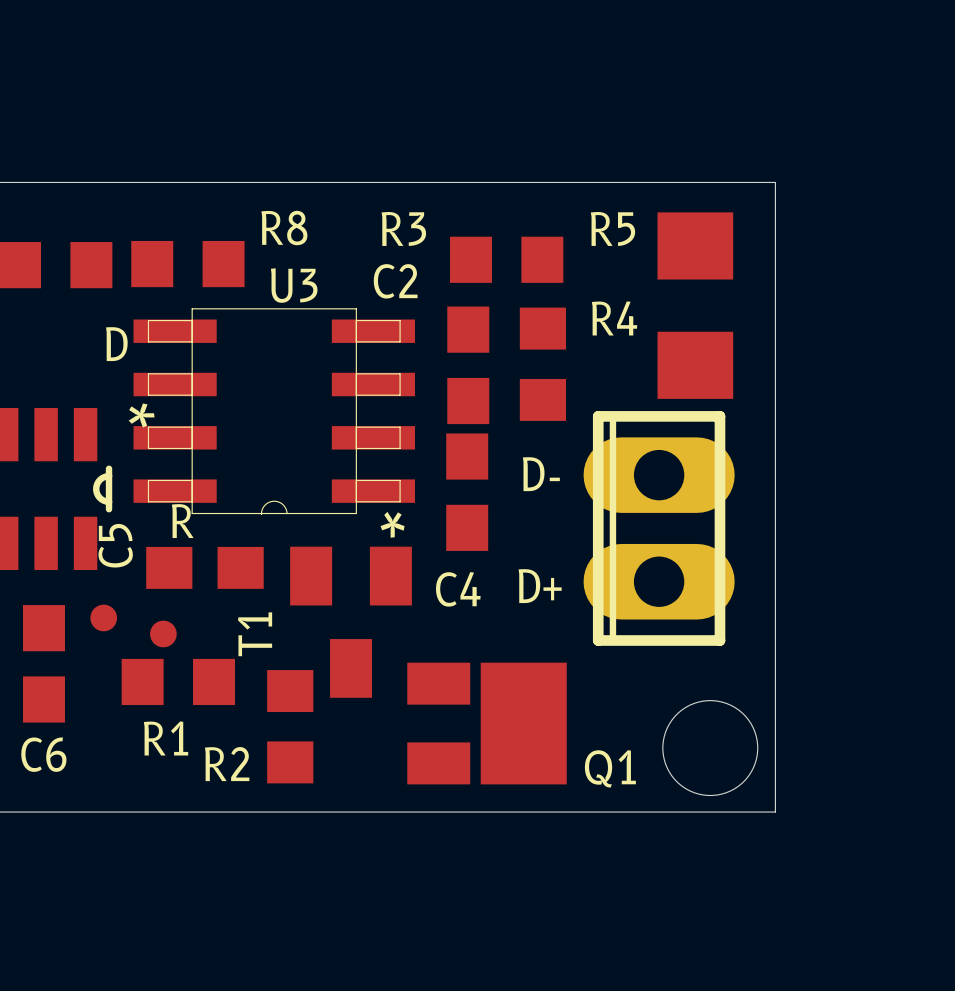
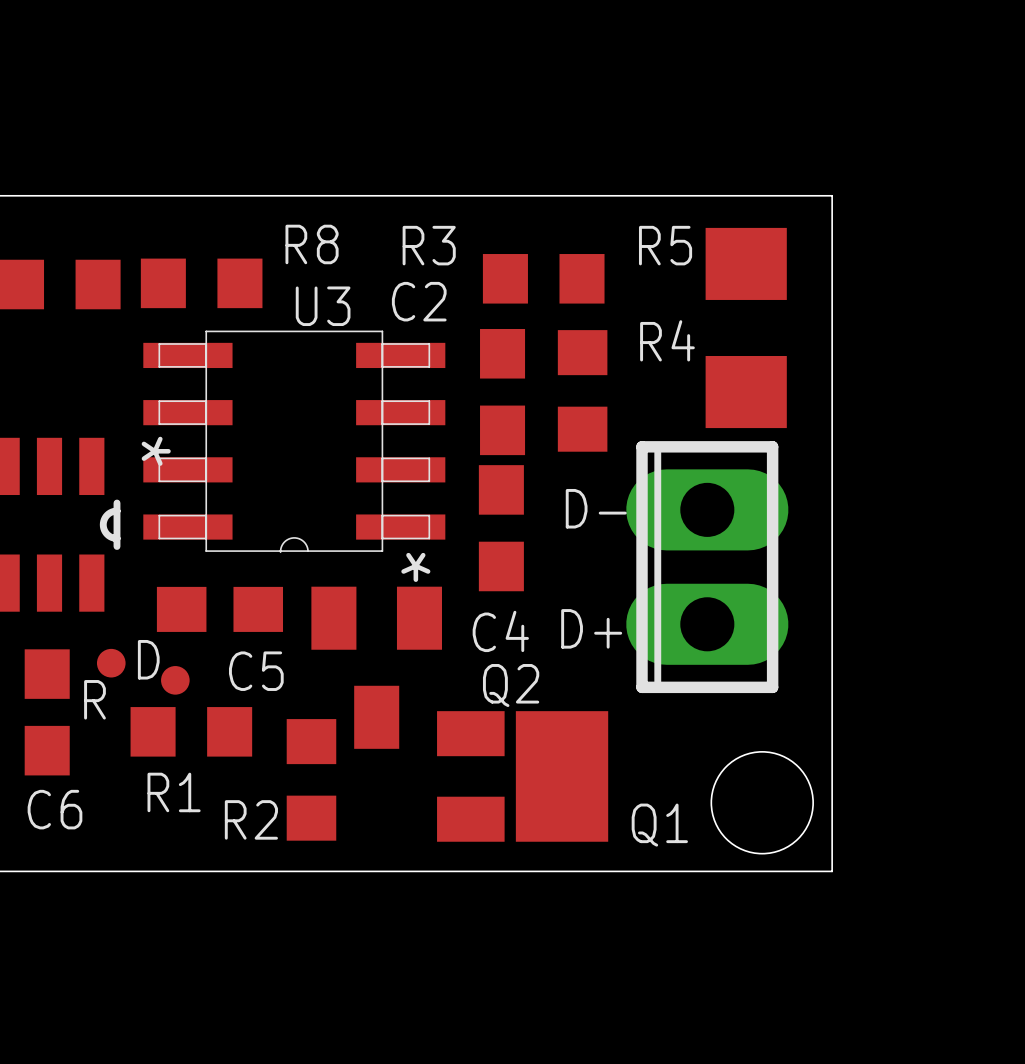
text position: D (116, 344) -> D (148, 659)
text position: R (182, 521) -> R (94, 699)
C5 name rotation: 0° (115, 545) -> 90° clockwise (256, 671)
C5 name position: C5 (115, 545) -> C5 (256, 671)
T1 name: T1 (255, 634) -> Q2 (511, 685)

